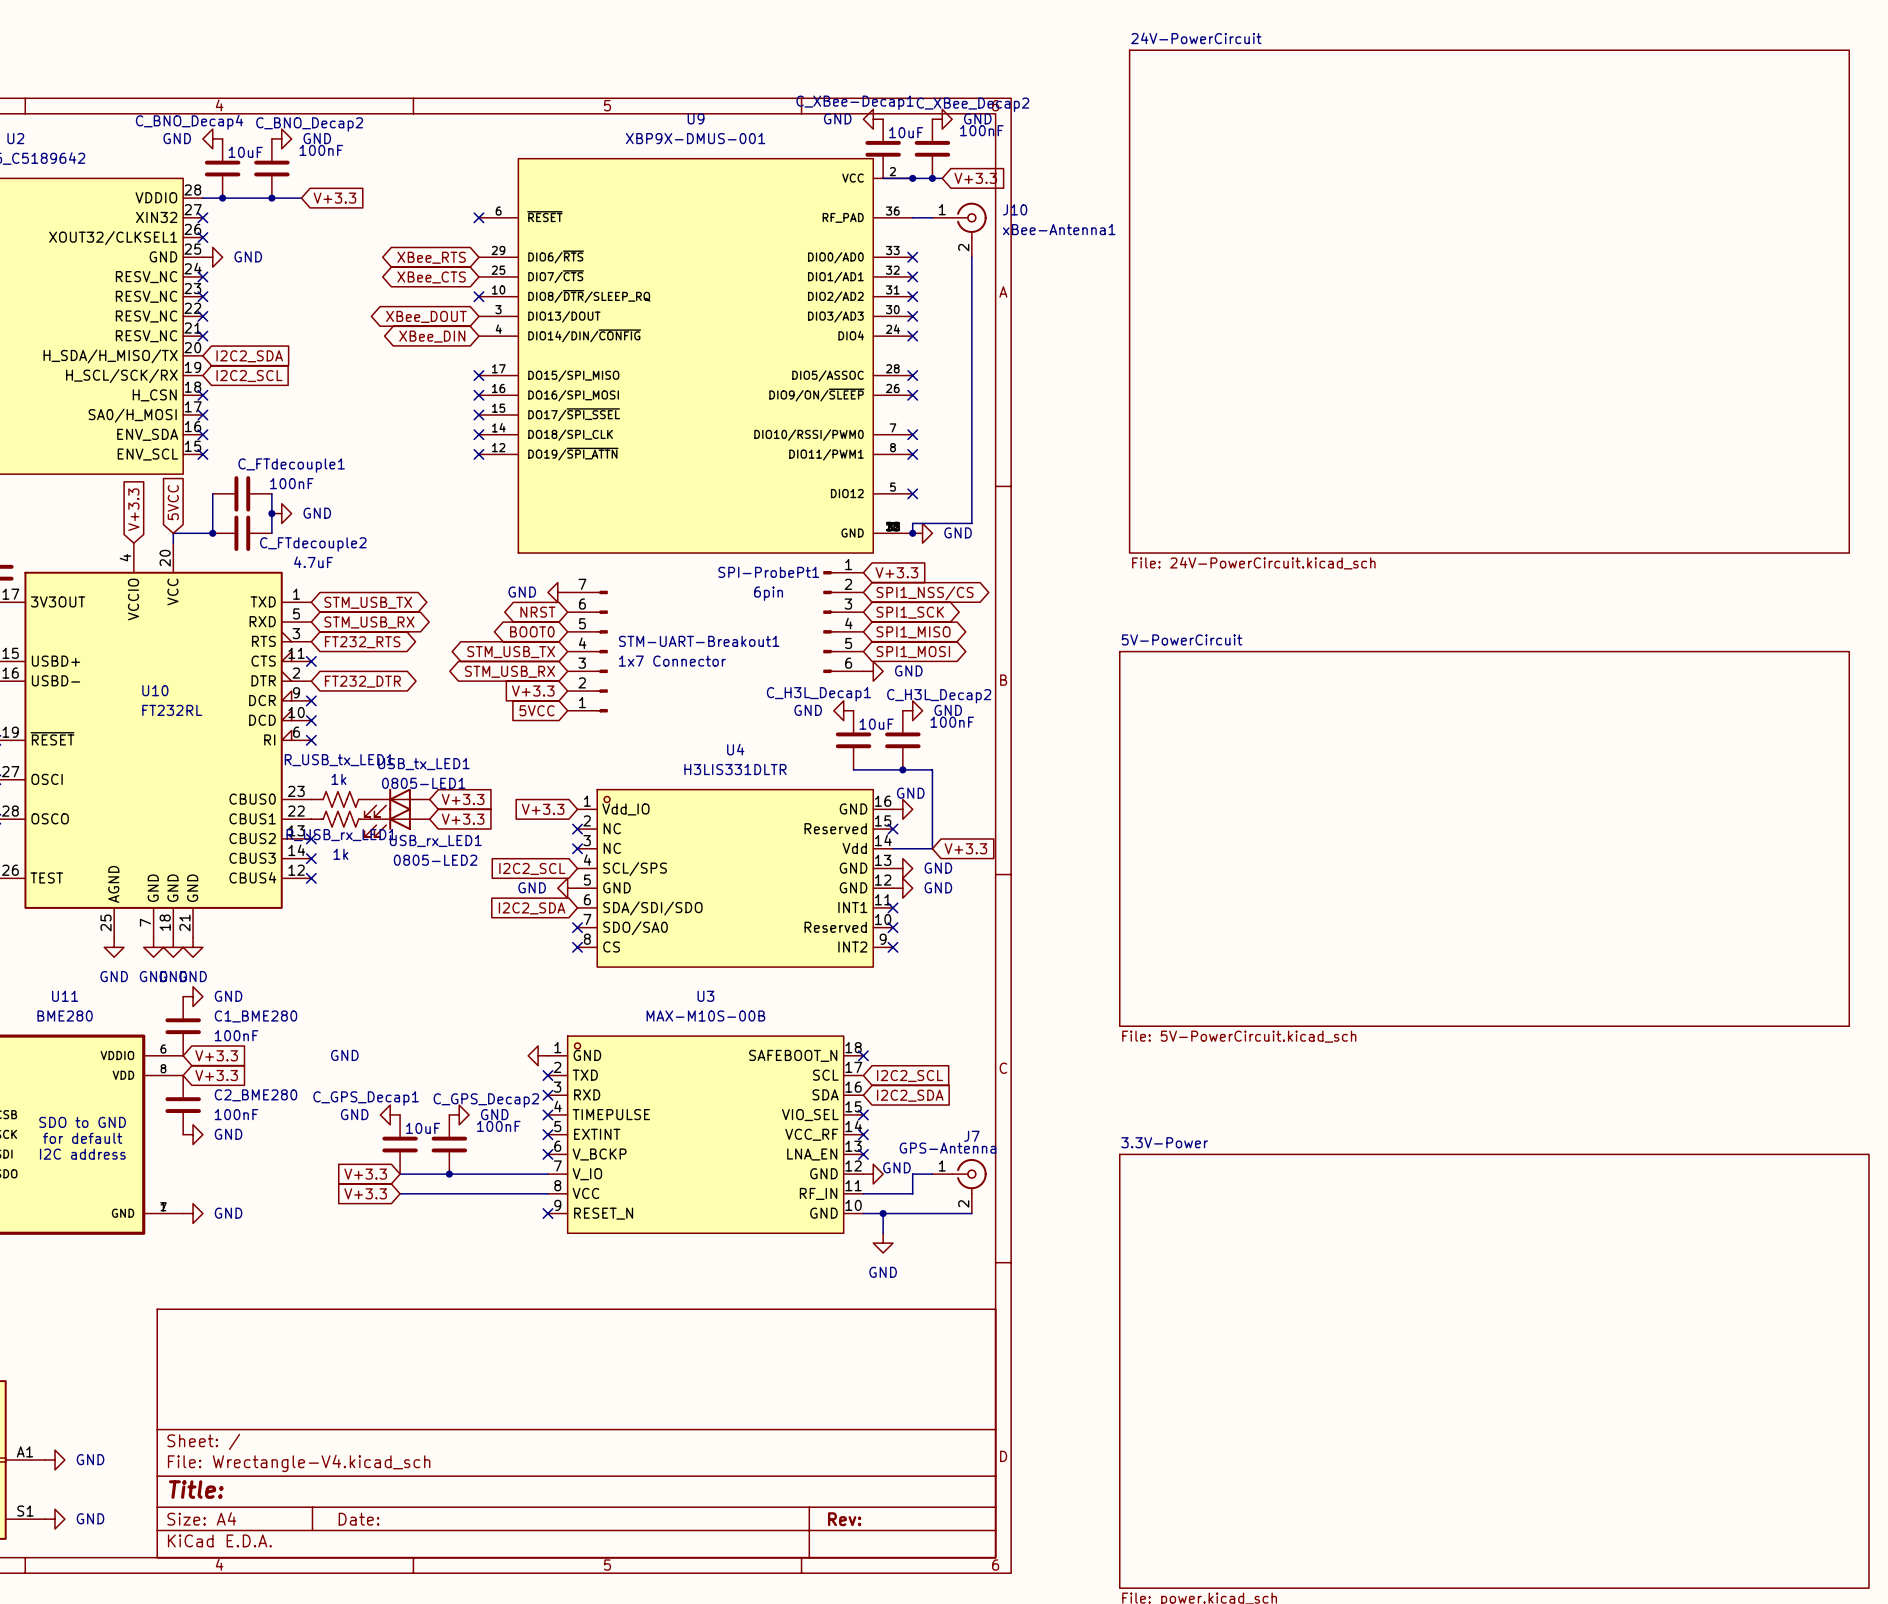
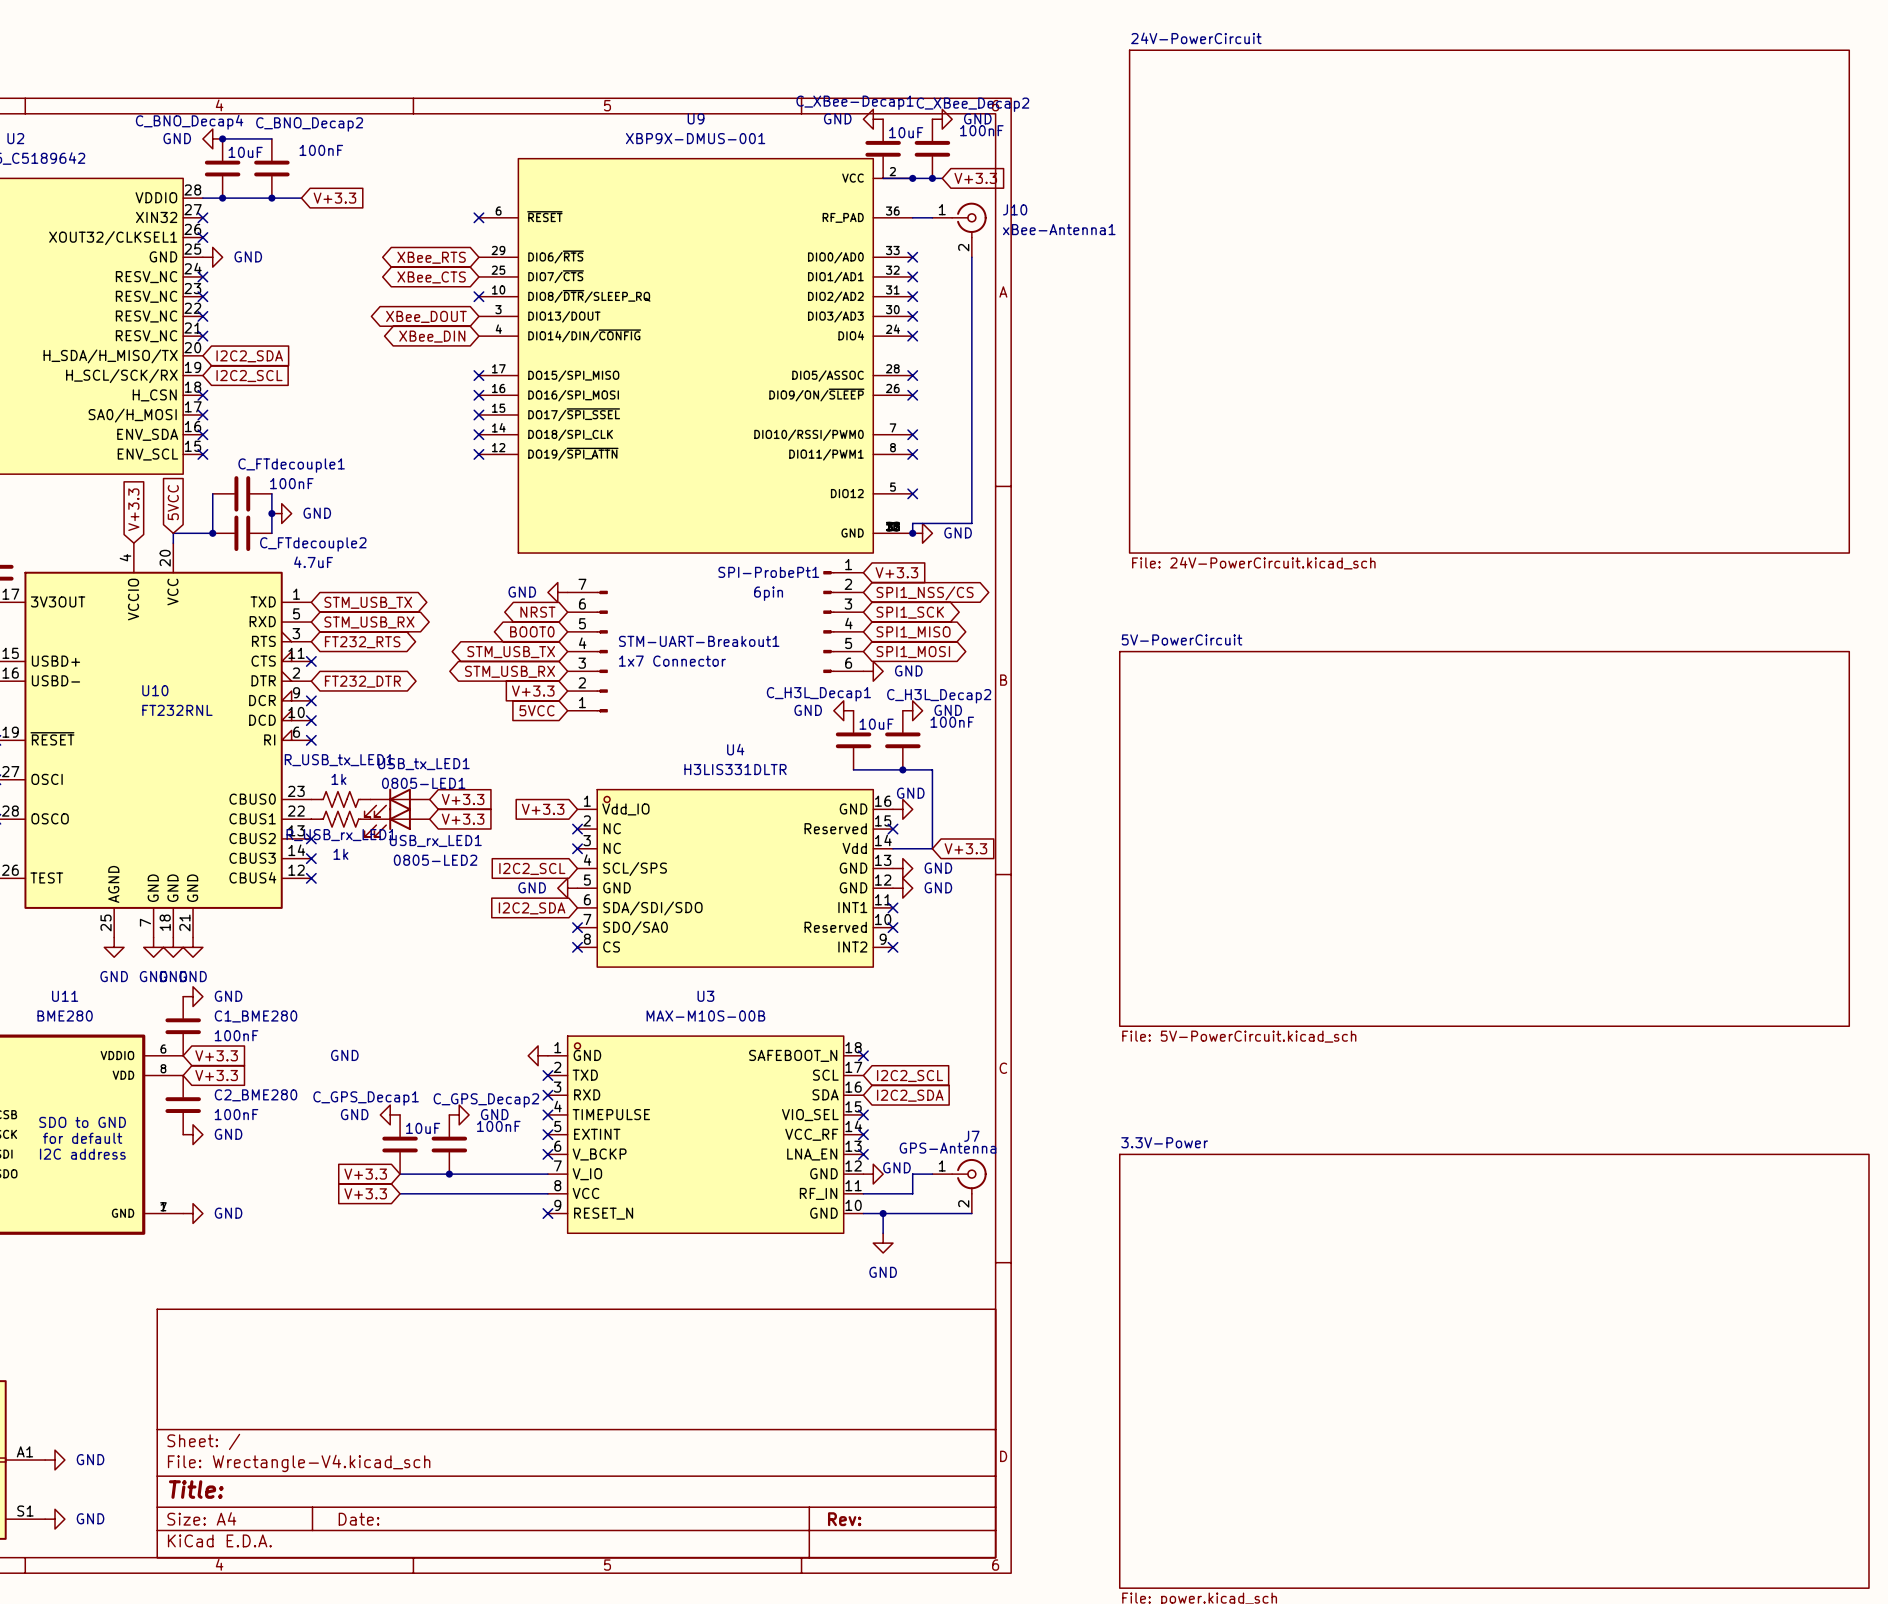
wire: none -> (222, 138) (271, 138)
junction: none -> (222, 138)
power symbol: GND (281, 138) -> none
U10 value: FT232RL (172, 710) -> FT232RNL (177, 710)

